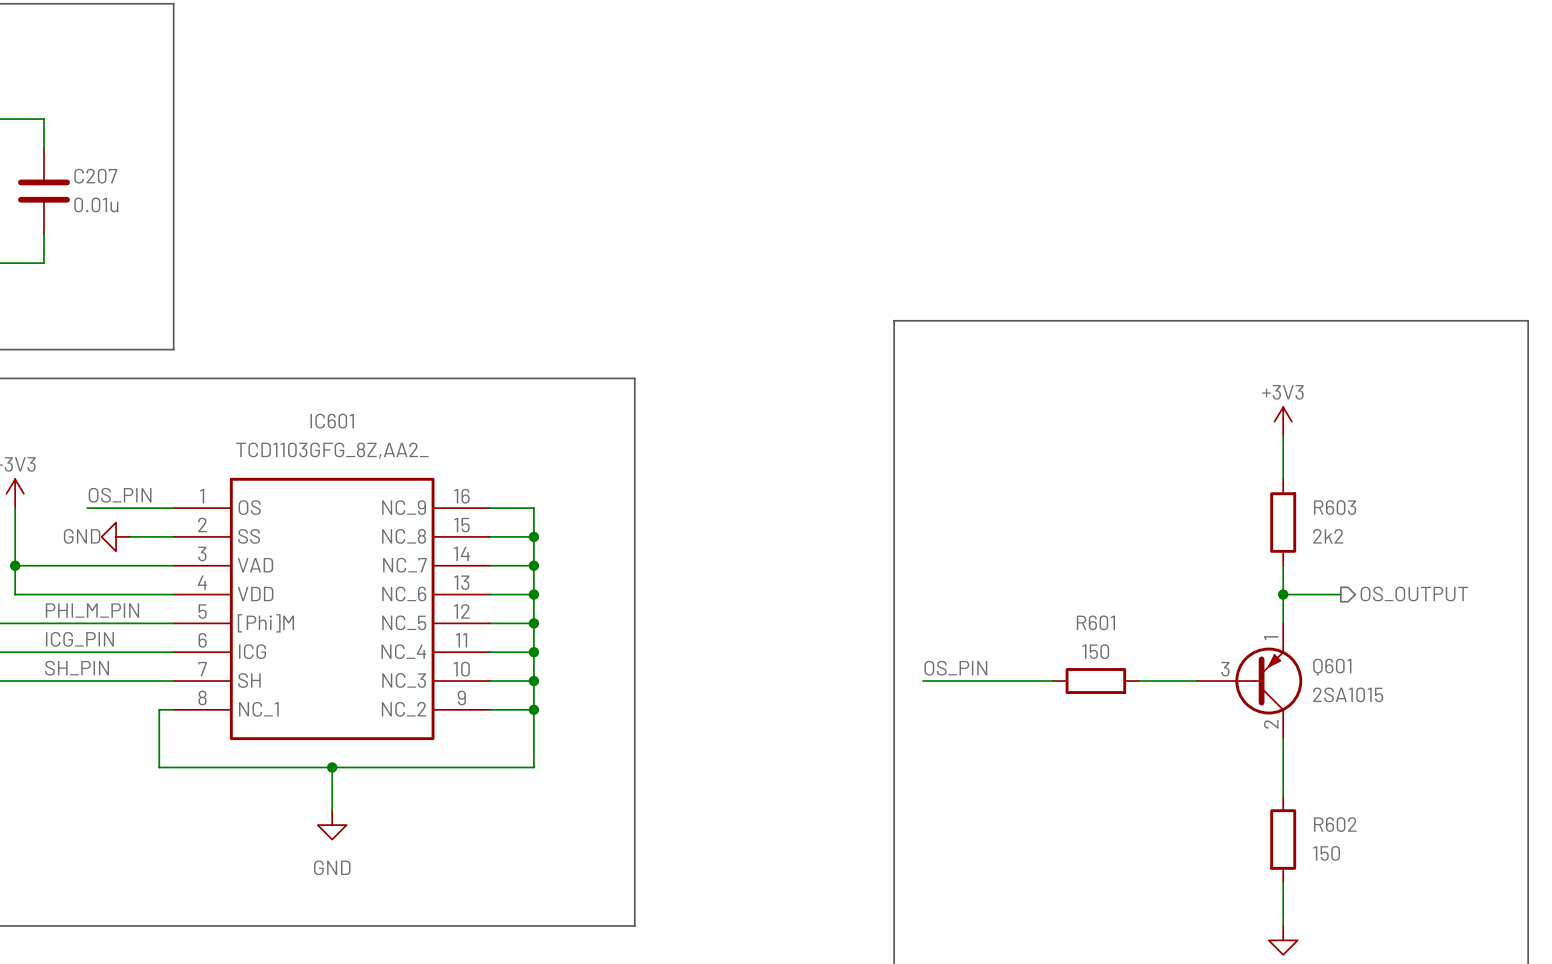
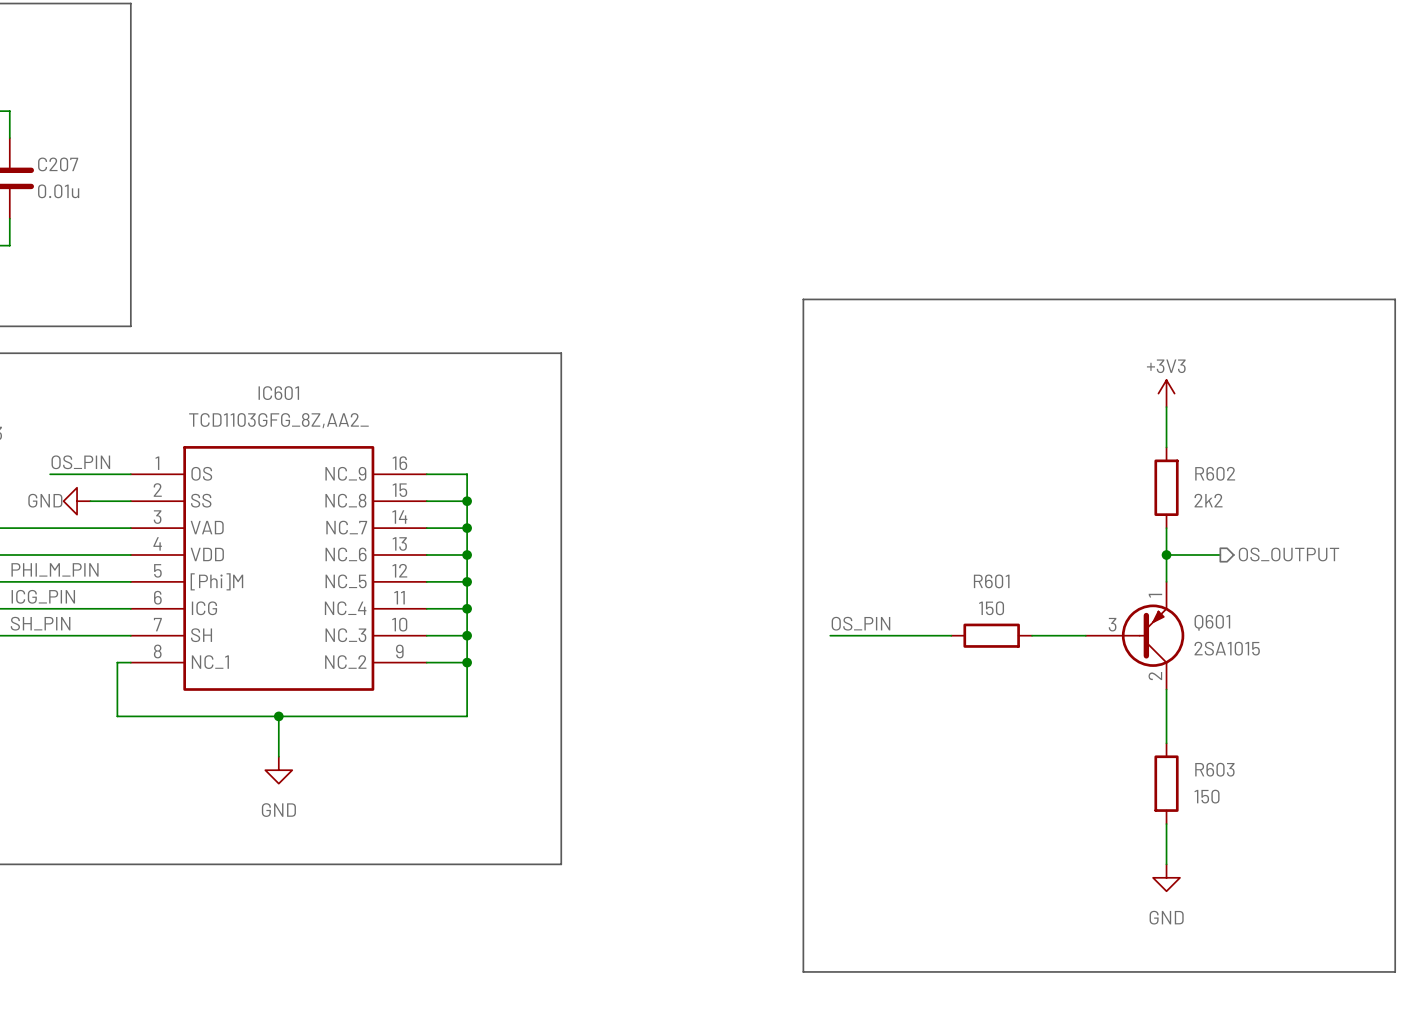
R603 name: R603 (1335, 507) -> R602 (1215, 473)
R602 name: R602 (1335, 824) -> R603 (1214, 769)

